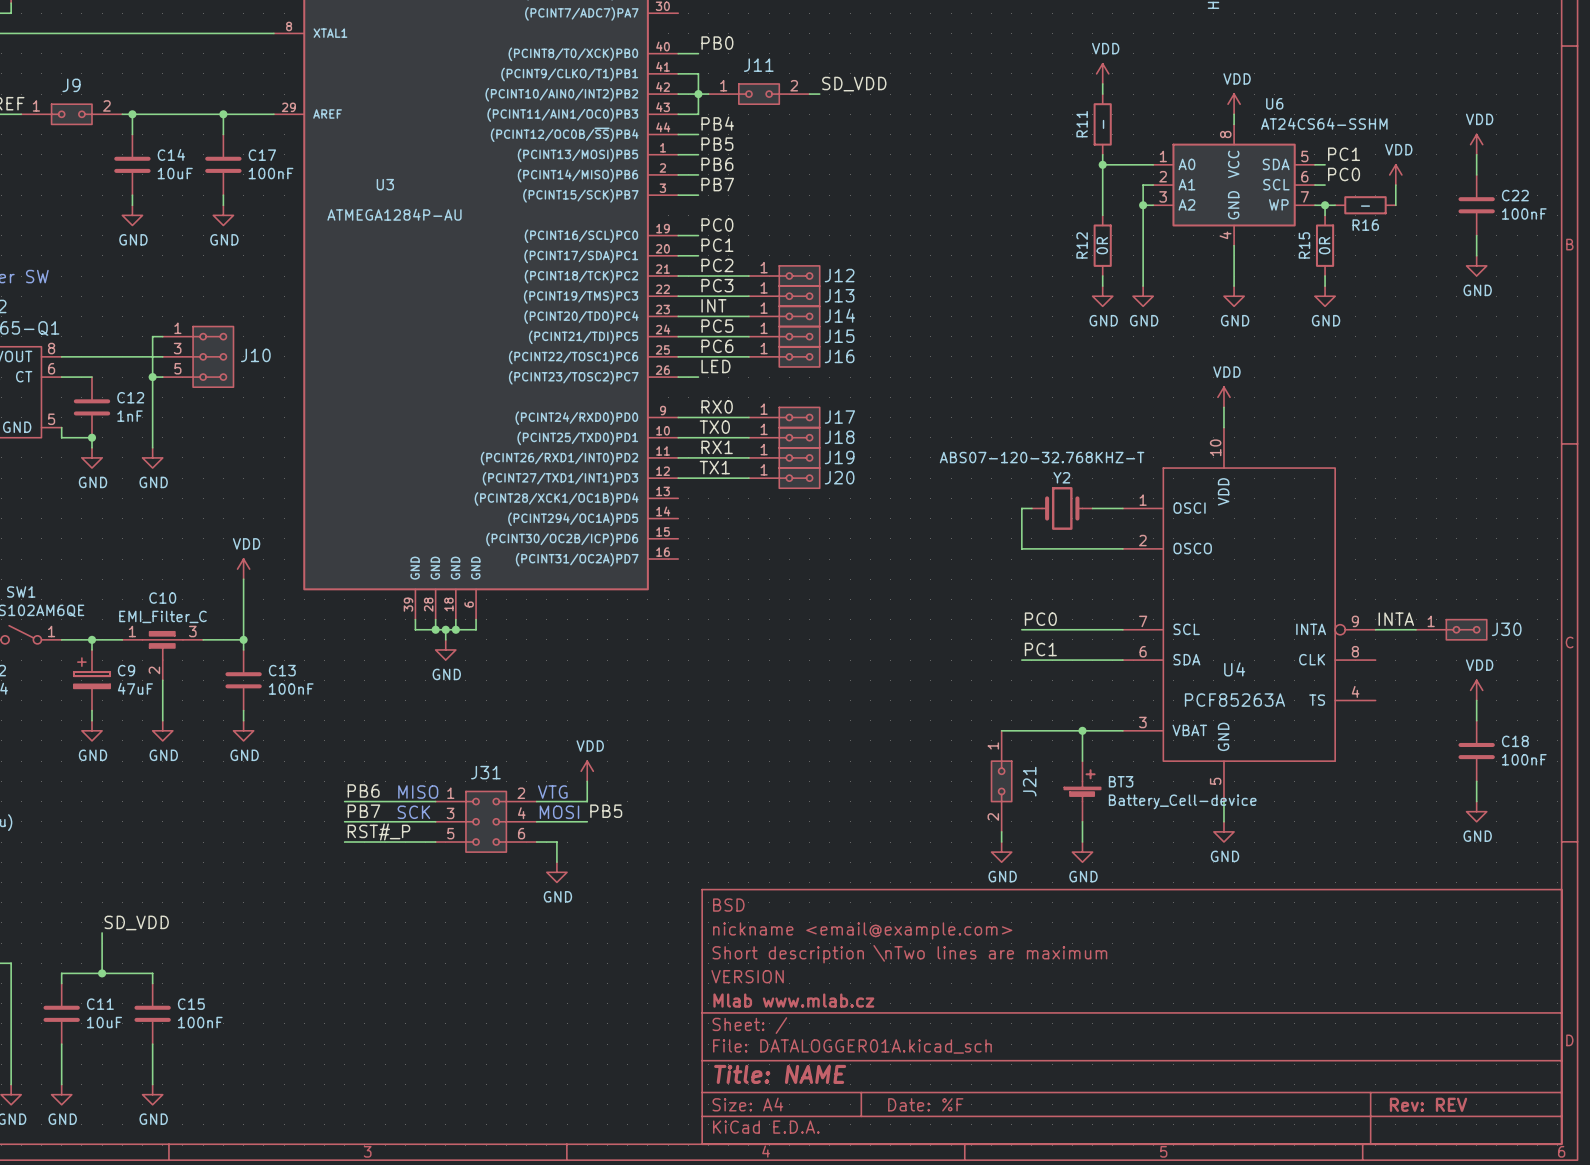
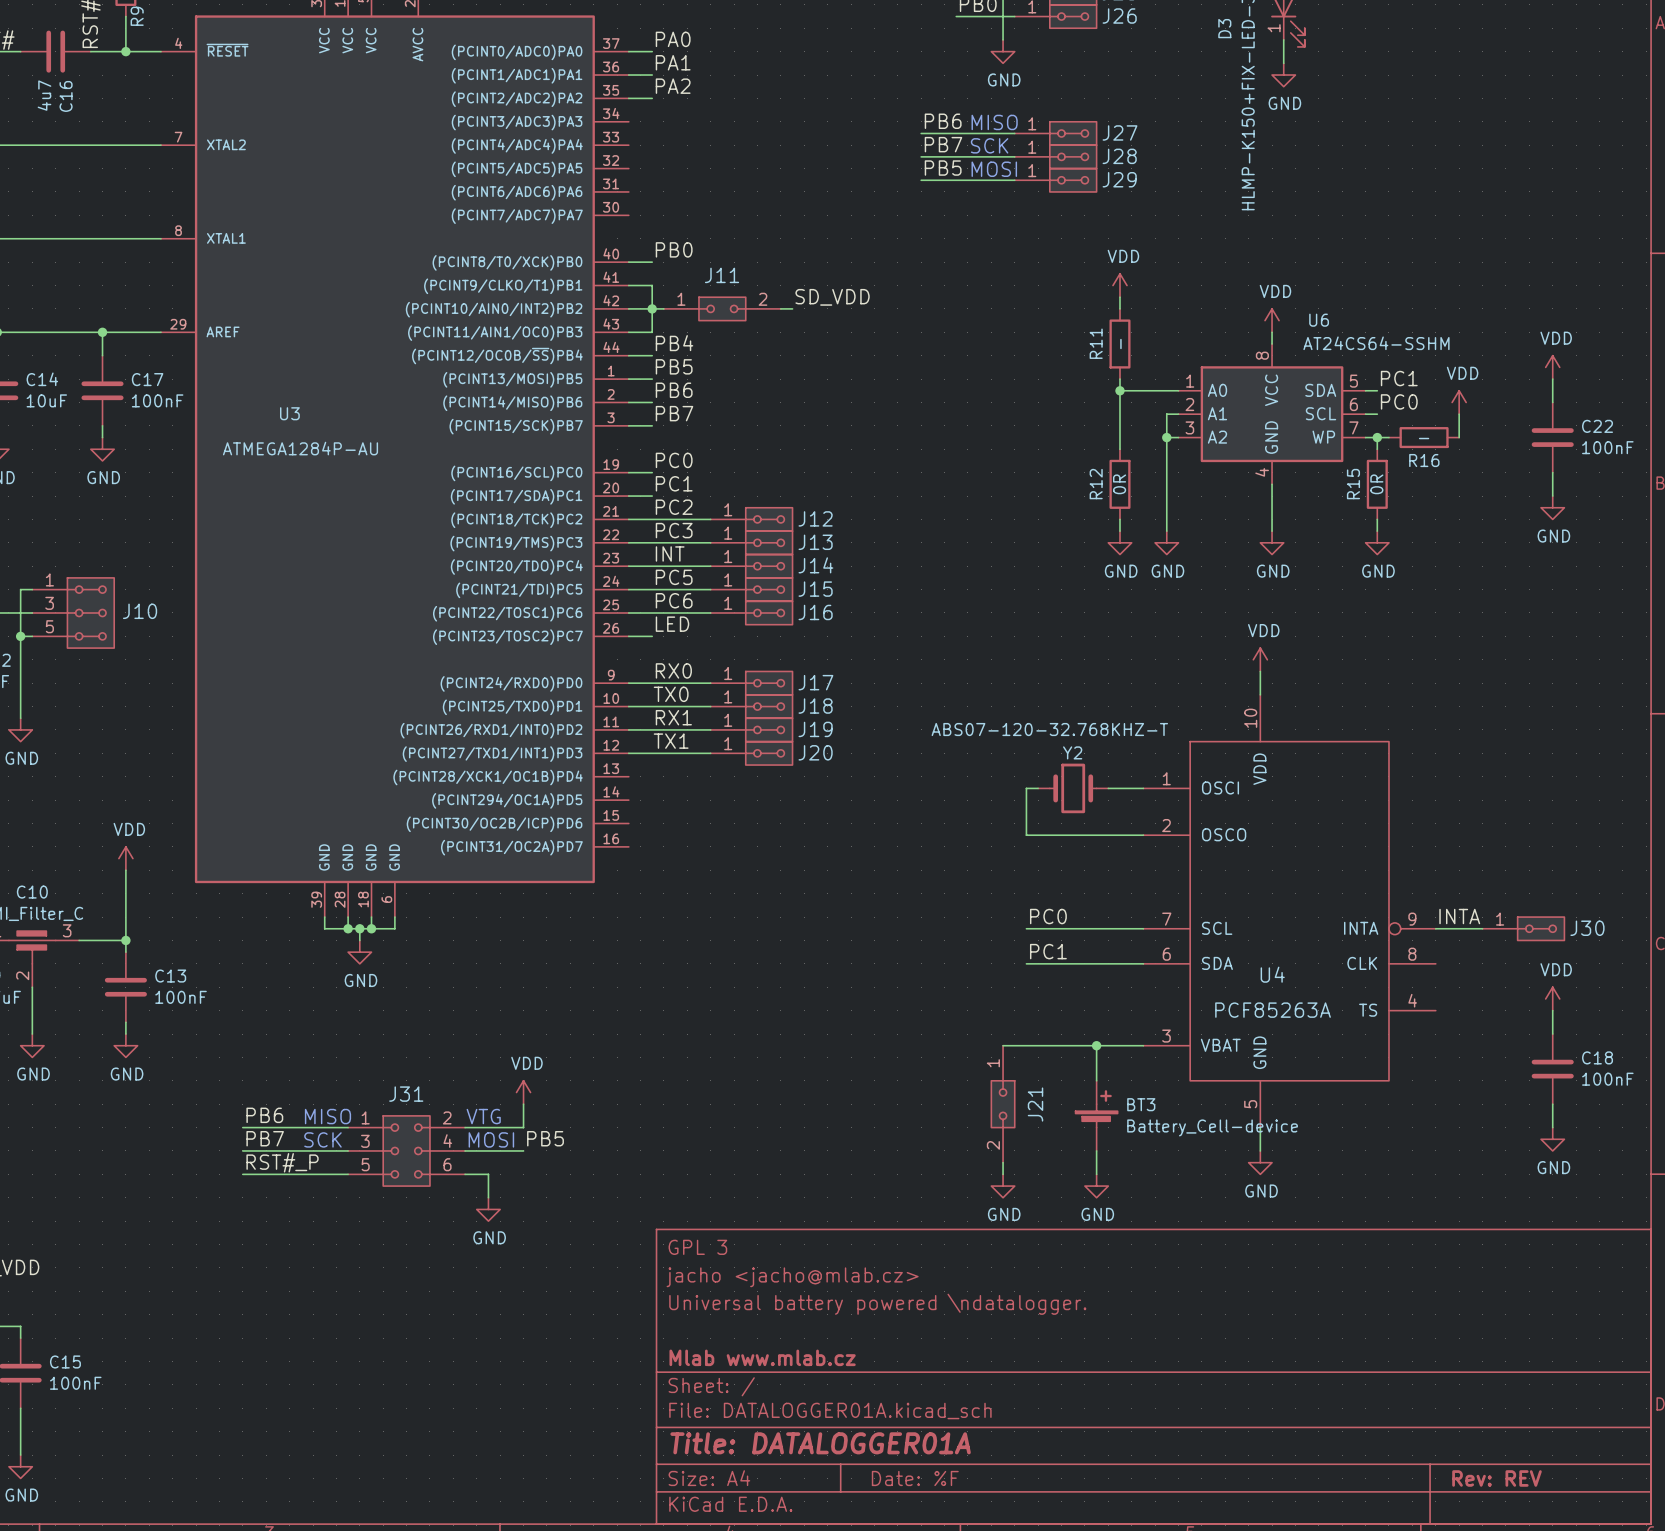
title block: BSD (728, 905) -> GPL 3 (697, 1247)
title block: nickname <email@example.com> (862, 930) -> jacho <jacho@mlab.cz> (792, 1277)
title block: Short description \nTwo lines are maximum (909, 954) -> Universal battery powered \ndatalogger. (877, 1304)
title block: VERSION (747, 976) -> none
title block: Title: NAME (780, 1074) -> Title: DATALOGGER01A (820, 1443)

